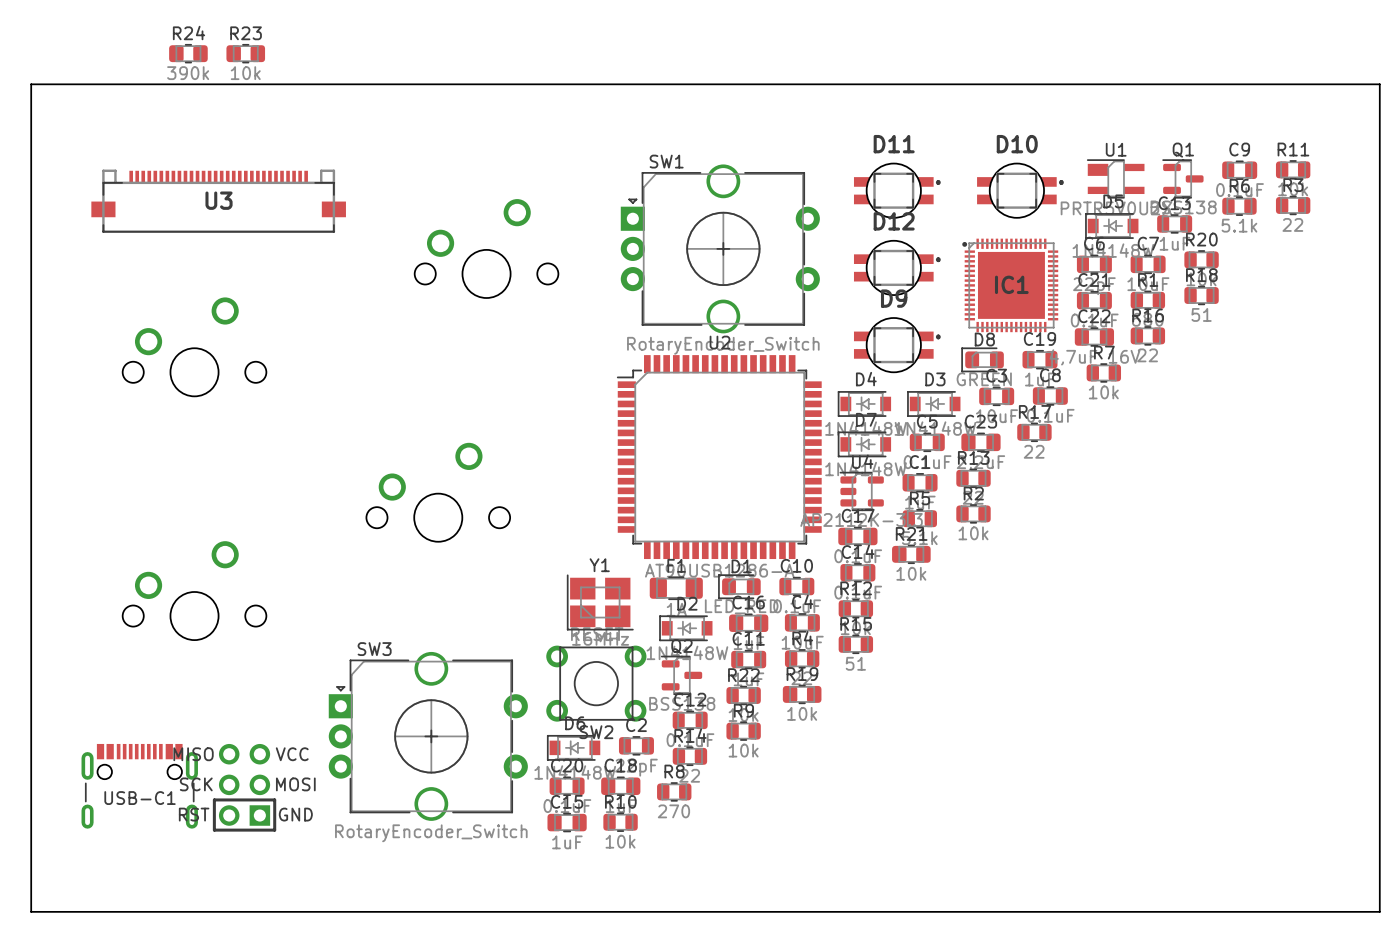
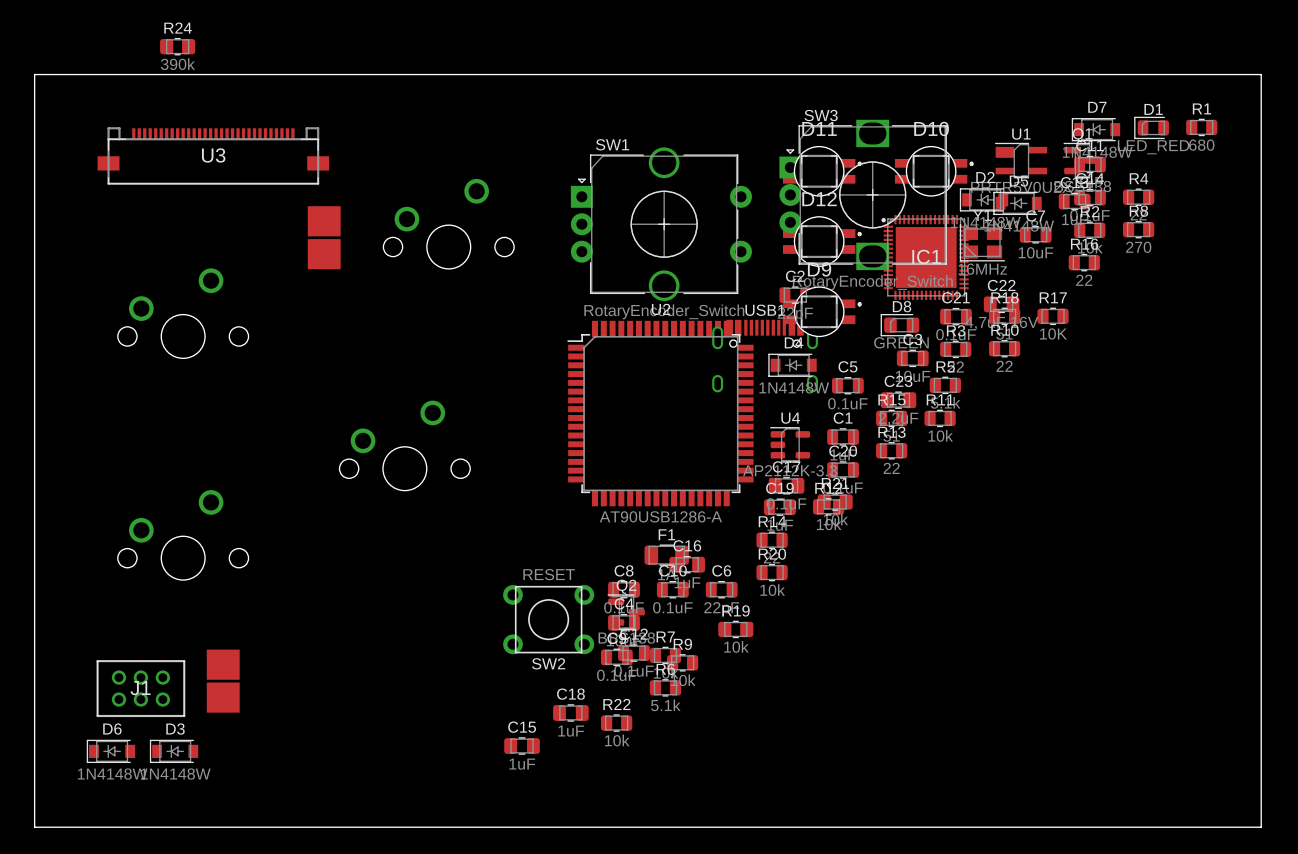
R23: 10k (245, 53) -> none
R11 position: (1293, 169) -> (940, 418)
C9 position: (1239, 170) -> (616, 657)
U3 position: (218, 201) -> (213, 155)
R3 position: (1293, 205) -> (955, 349)
R6 position: (1239, 206) -> (665, 687)
R20 position: (1201, 259) -> (772, 572)
part: none -> (324, 237)
C6 position: (1094, 264) -> (721, 589)
C7 position: (1148, 264) -> (1035, 234)
R18 position: (1201, 295) -> (1004, 316)
C21 position: (1094, 300) -> (955, 316)
R1 position: (1147, 300) -> (1201, 127)
R16 position: (1147, 335) -> (1084, 262)
C19 position: (1039, 359) -> (779, 507)
R7 position: (1103, 372) -> (665, 655)
USB1: none -> (765, 356)
C8 position: (1050, 396) -> (623, 589)
D3 position: (933, 403) -> (174, 751)
R17 position: (1034, 432) -> (1053, 316)
C5 position: (927, 442) -> (847, 385)
D7 position: (864, 444) -> (1095, 129)
R17 value: 22 (1034, 451) -> 10K (1053, 334)
R13 position: (973, 478) -> (891, 450)
R2 position: (973, 513) -> (1089, 230)
R5 position: (919, 518) -> (945, 385)
C14 position: (857, 572) -> (1090, 197)
Y1 footprint: [566, 574, 634, 631] -> [959, 223, 1006, 262]
D1 footprint: [718, 574, 761, 600] -> [1134, 116, 1169, 140]
F1 footprint: [649, 576, 703, 600] -> [644, 544, 689, 566]
C10 position: (796, 586) -> (672, 589)
R12 position: (855, 608) -> (828, 506)
C4 position: (802, 622) -> (623, 622)
D2 position: (685, 628) -> (984, 199)
R15 position: (855, 644) -> (891, 418)
SW3 footprint: [328, 651, 528, 821] -> [779, 119, 947, 271]
R4 position: (802, 658) -> (1138, 197)
C11 position: (748, 659) -> (1090, 164)
R22 position: (743, 695) -> (616, 723)
C2 position: (636, 745) -> (795, 295)
D6 position: (573, 747) -> (110, 751)
part: none -> (223, 681)
R14 position: (689, 756) -> (772, 540)
J1: none -> (140, 688)
USB-C1: (139, 786) -> none
C20 position: (567, 786) -> (843, 469)
part: (244, 787) -> none
R8 position: (674, 791) -> (1138, 229)
R10 position: (620, 822) -> (1004, 348)
R10 value: 10k (620, 841) -> 22 (1004, 366)

